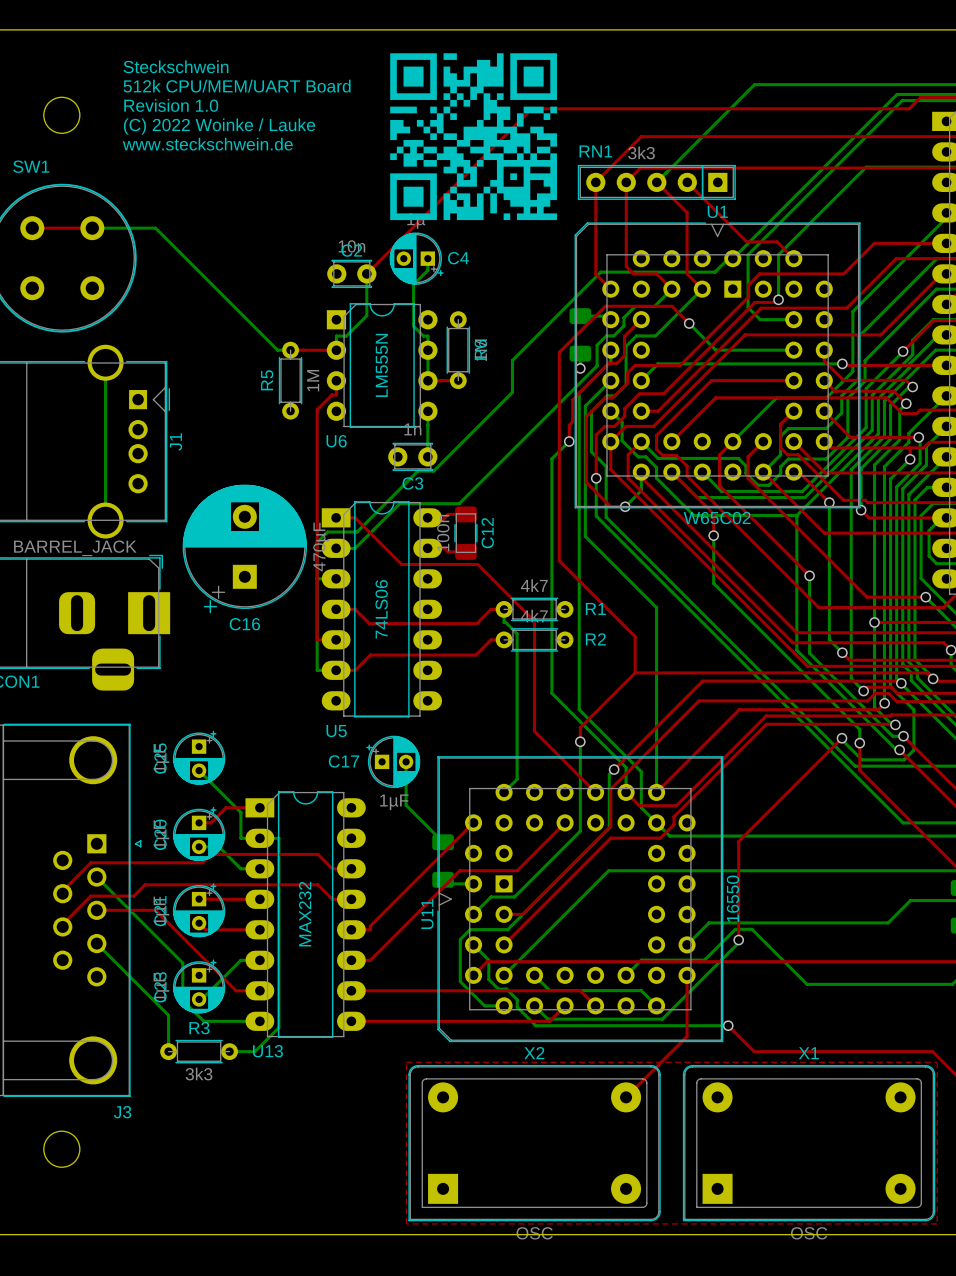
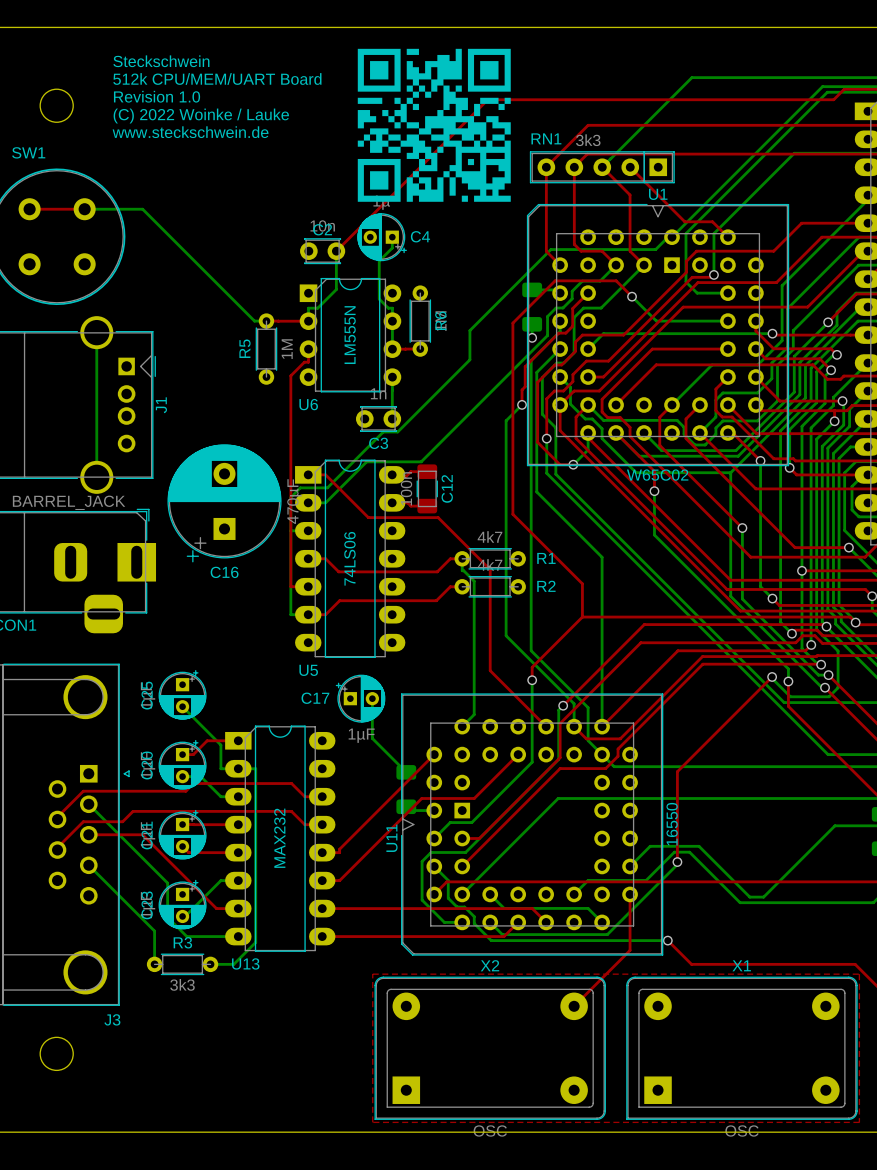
bottom track: (762, 922) (888, 922) -> (699, 846) (749, 897) (763, 897) (814, 846)

